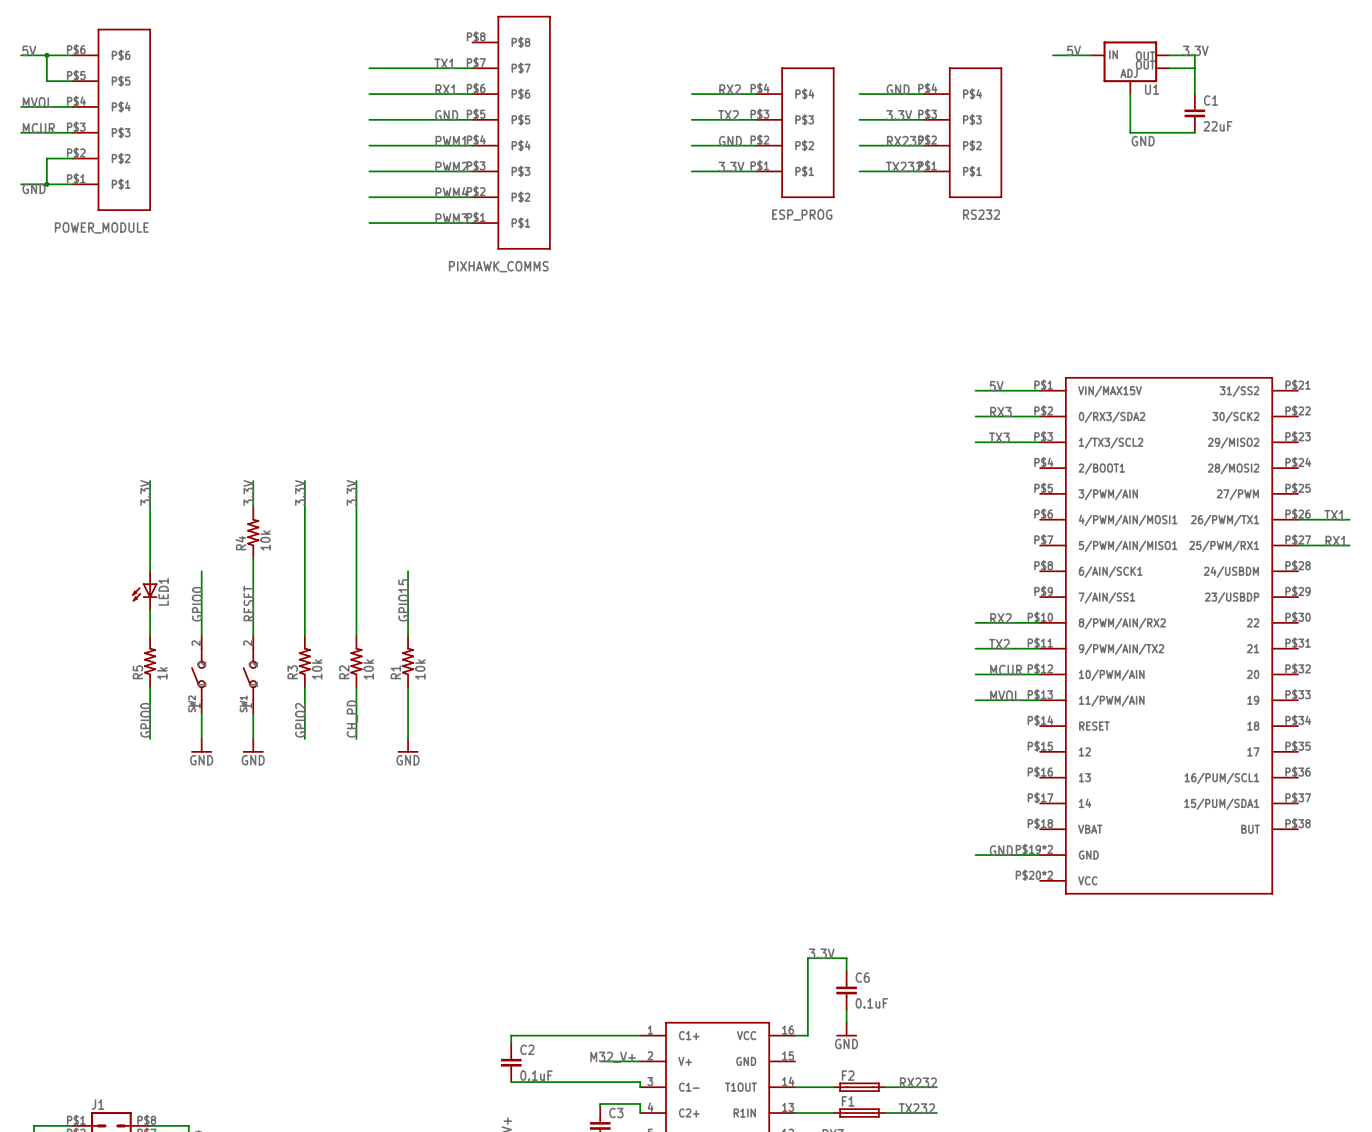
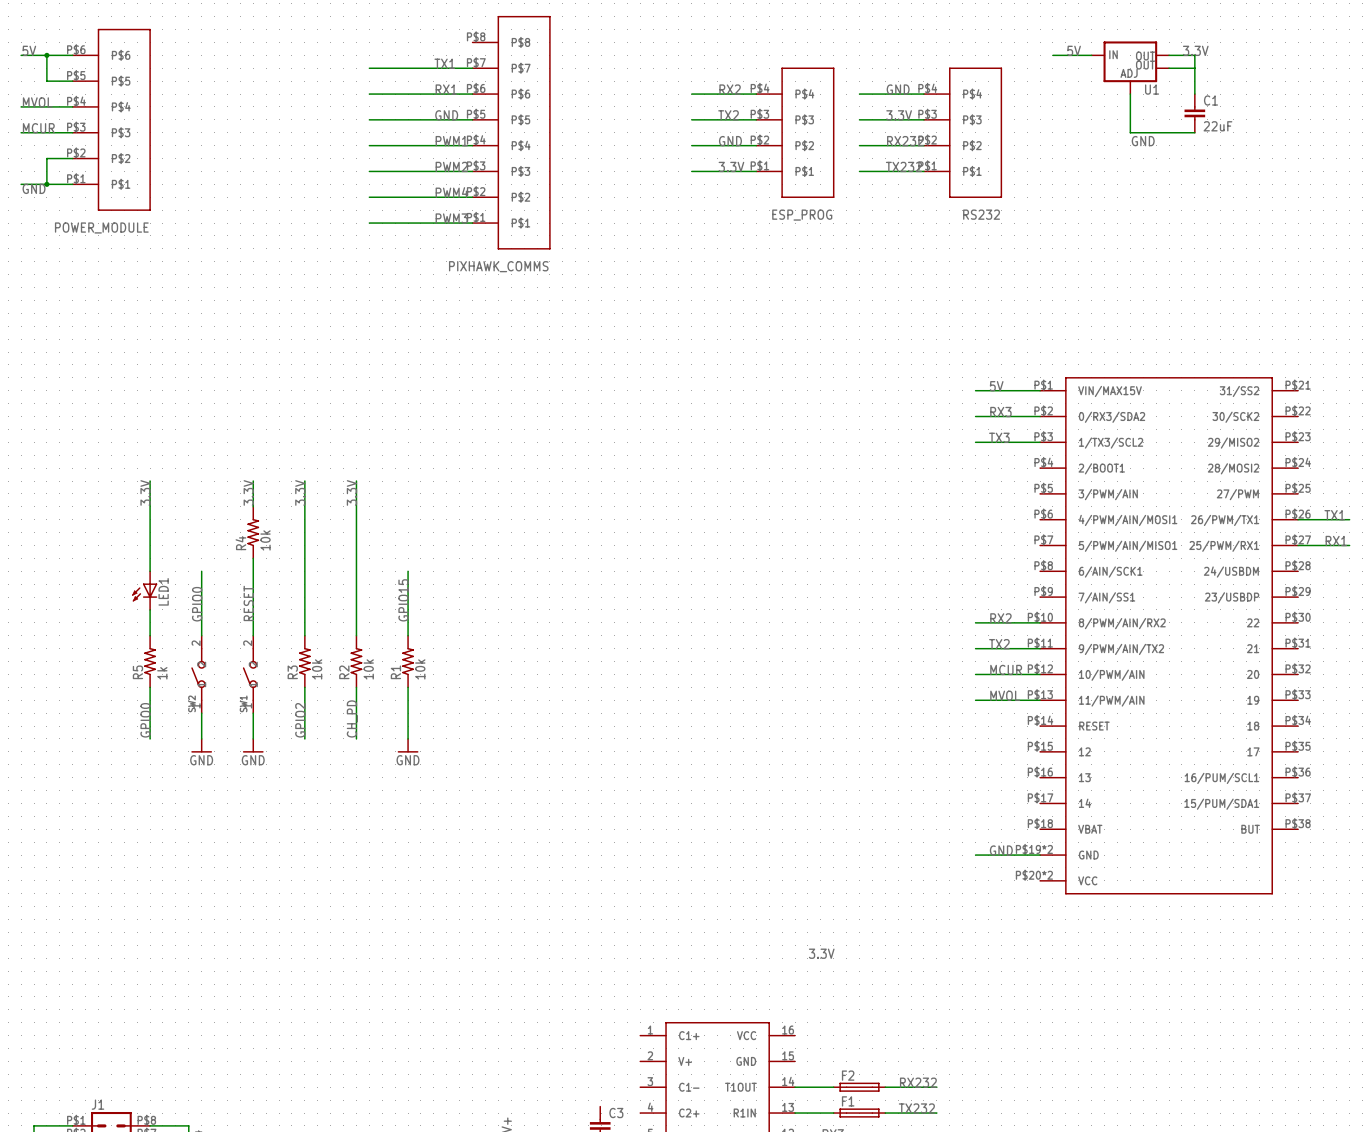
wire: (846, 971) (846, 958) (807, 958) (807, 1035) (795, 1035) -> none
C6: 0.1uF (846, 990) -> none
wire: (846, 1009) (846, 1022) -> none
power symbol: GND (846, 1029) -> none
wire: (640, 1035) (511, 1035) (511, 1043) -> none
label: M32_V+ (613, 1057) -> none
wire: (601, 1061) (640, 1061) -> none
C2: 0.1uF (511, 1062) -> none
wire: (511, 1082) (640, 1082) (640, 1087) -> none
wire: (600, 1106) (600, 1103) (640, 1103) (640, 1113) -> none

